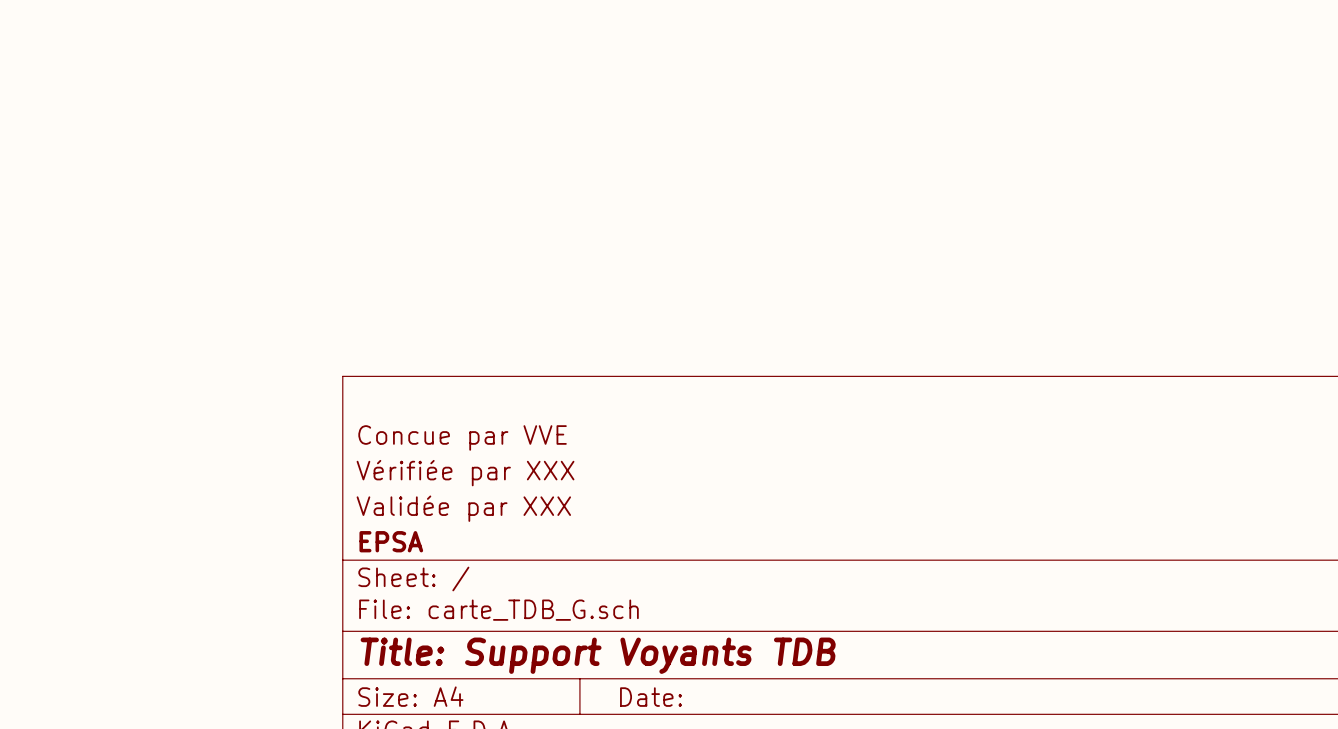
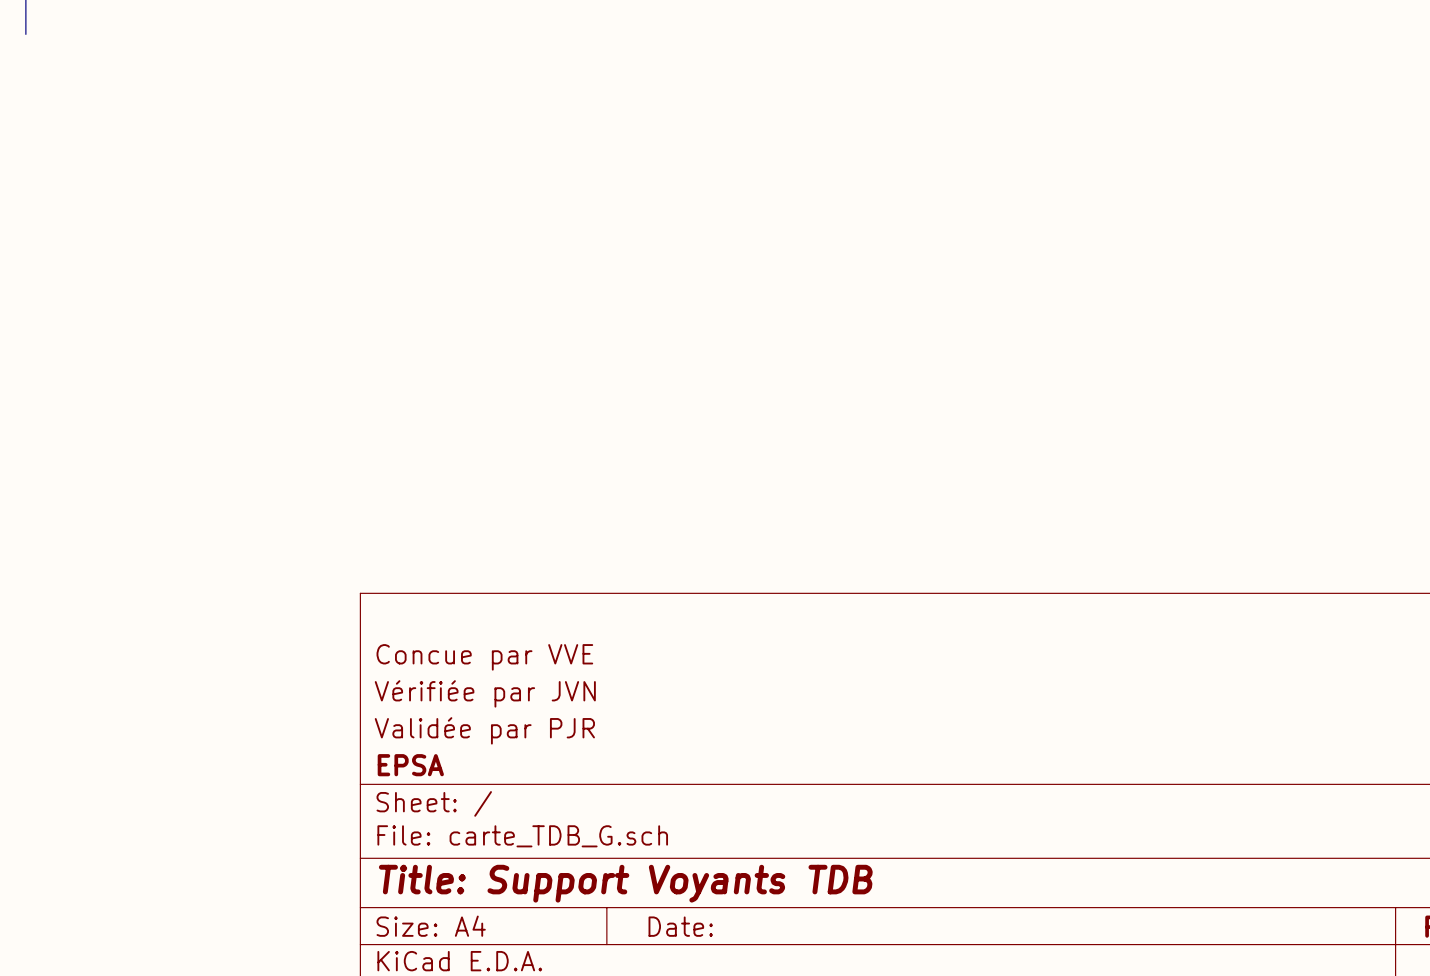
title block: Vérifiée par XXX (465, 473) -> Vérifiée par JVN (485, 693)
title block: Validée par XXX (463, 508) -> Validée par PJR (484, 730)

